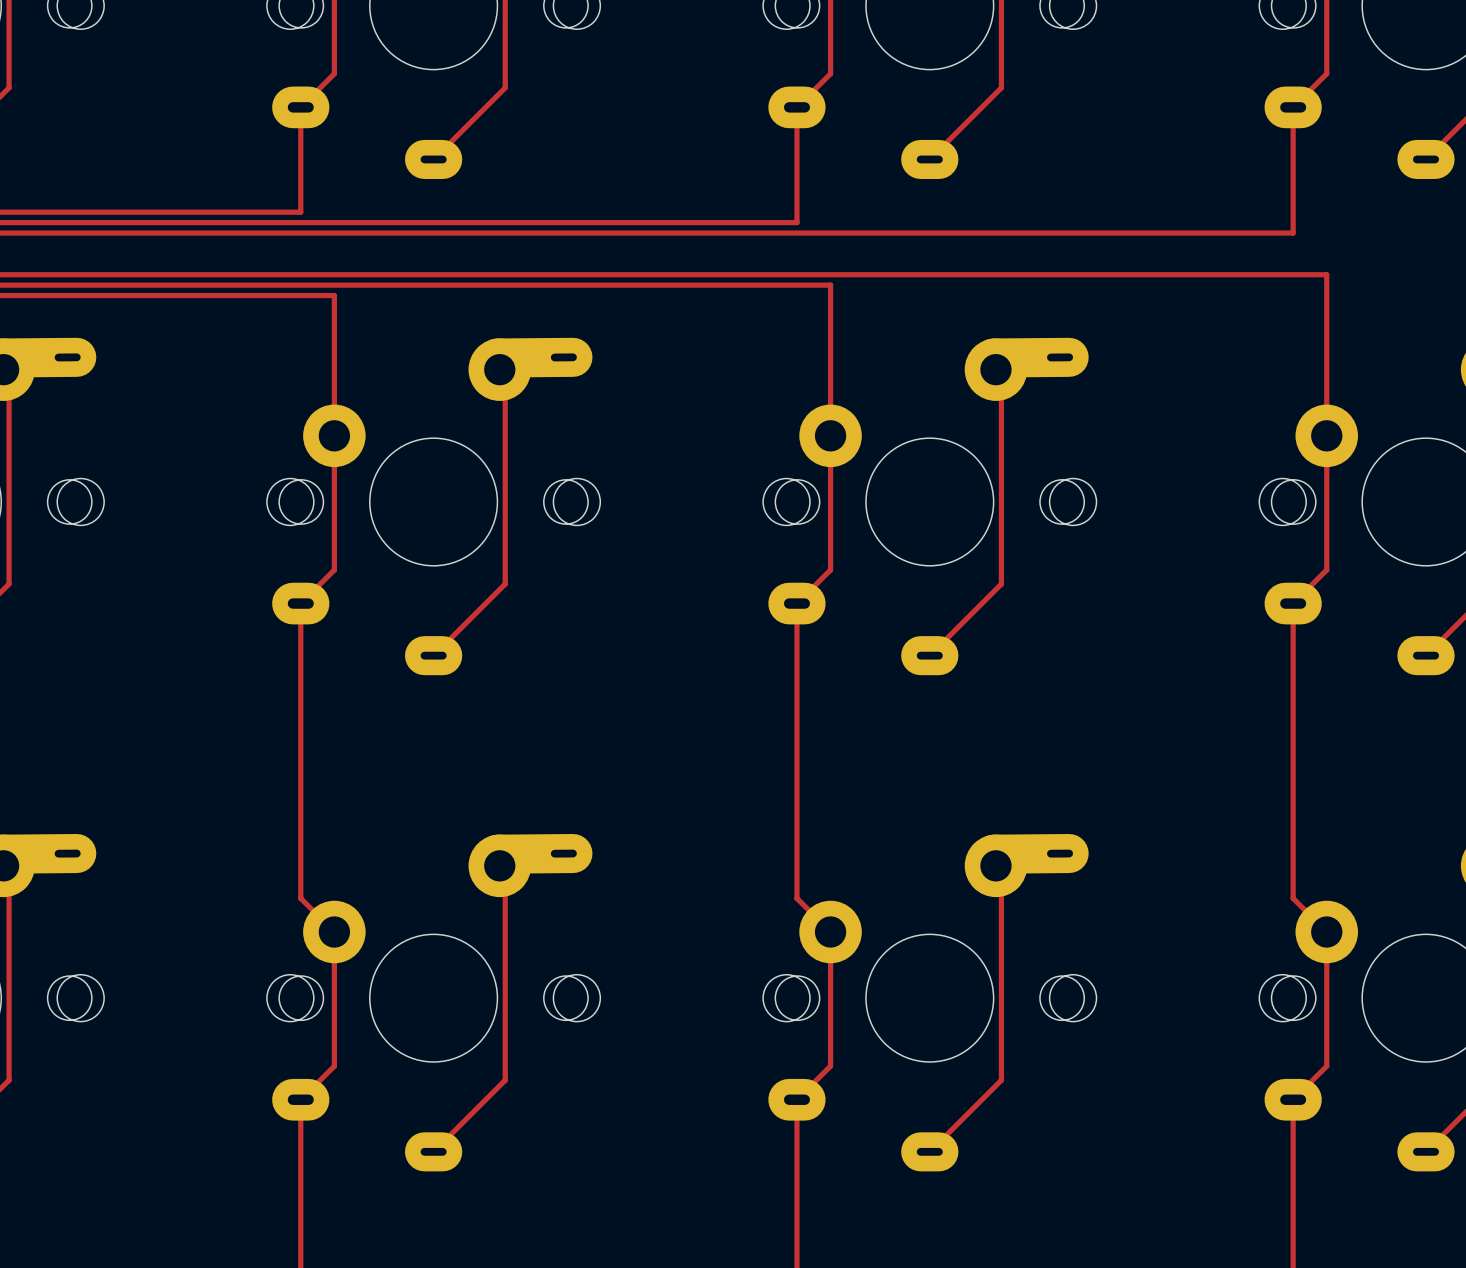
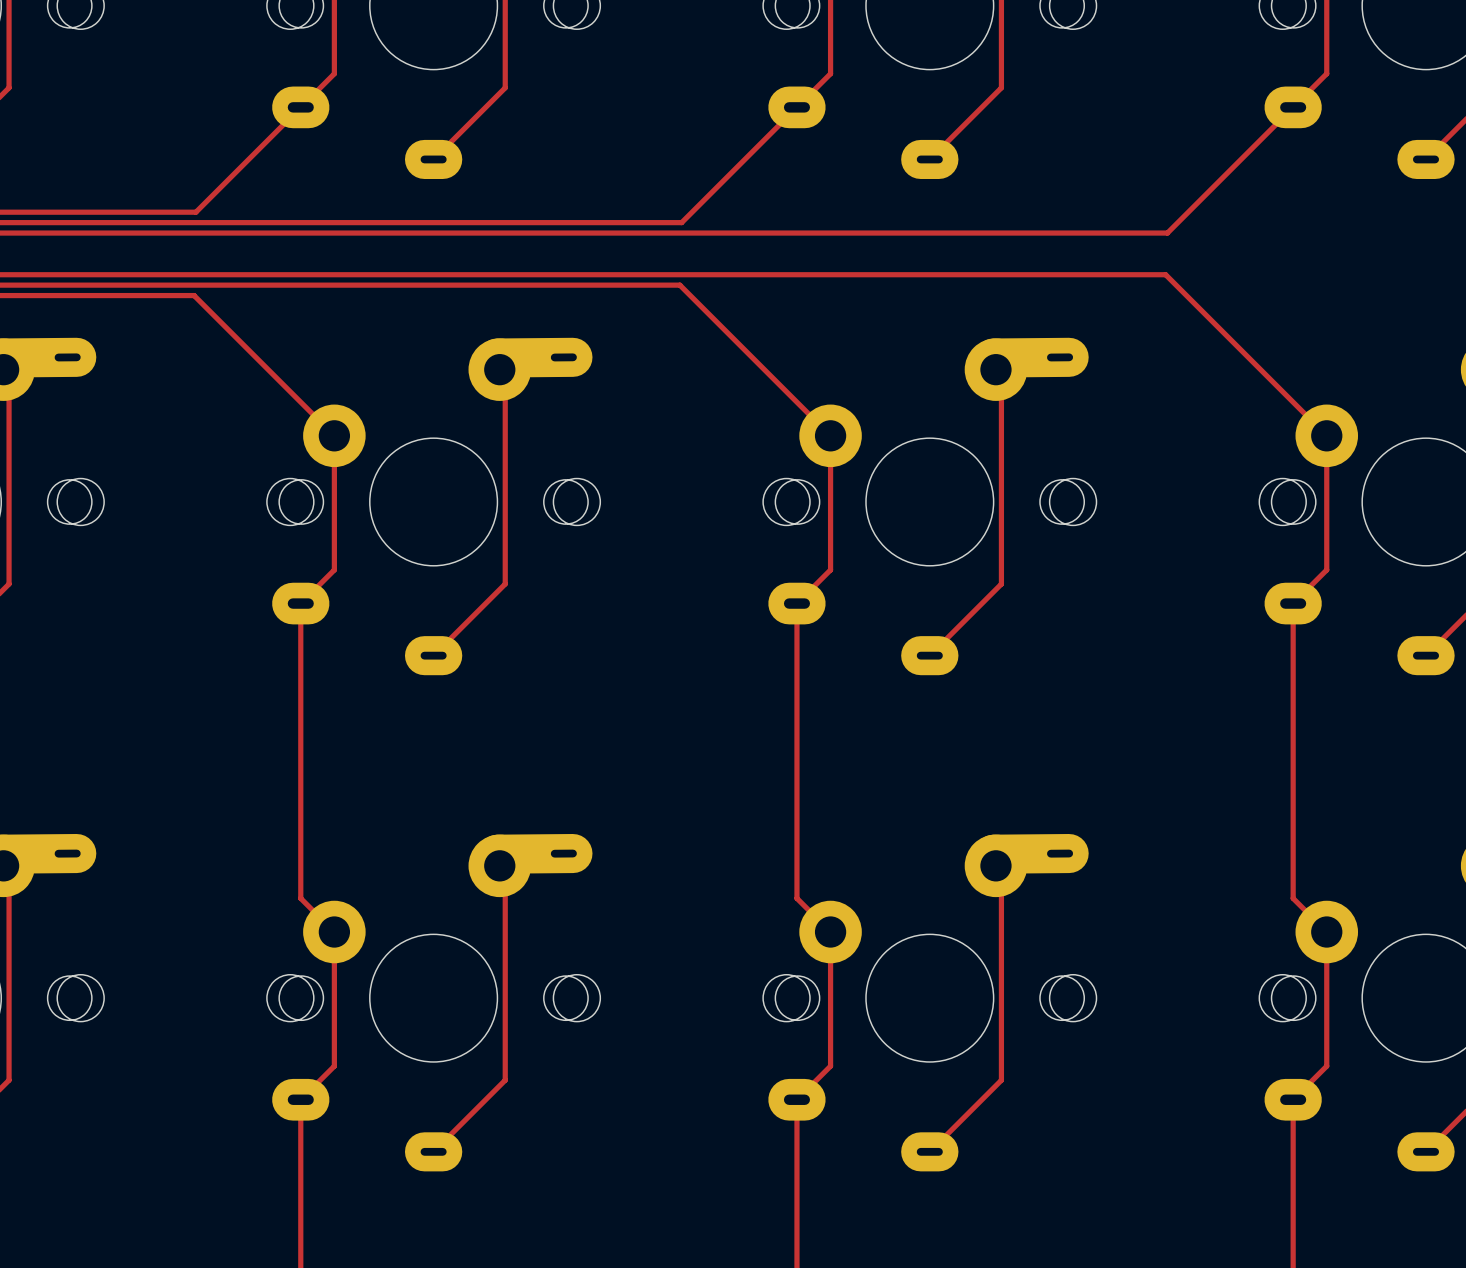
track: (300, 107) (300, 212) (195, 212) -> (300, 107) (195, 212)
track: (796, 107) (796, 222) (681, 222) -> (796, 107) (681, 222)
track: (1293, 107) (1293, 233) (1167, 233) -> (1293, 107) (1167, 233)
track: (1165, 274) (1326, 274) (1326, 435) -> (1165, 274) (1326, 435)
track: (679, 285) (830, 285) (830, 435) -> (679, 285) (830, 435)
track: (194, 295) (334, 295) (334, 435) -> (194, 295) (334, 435)

